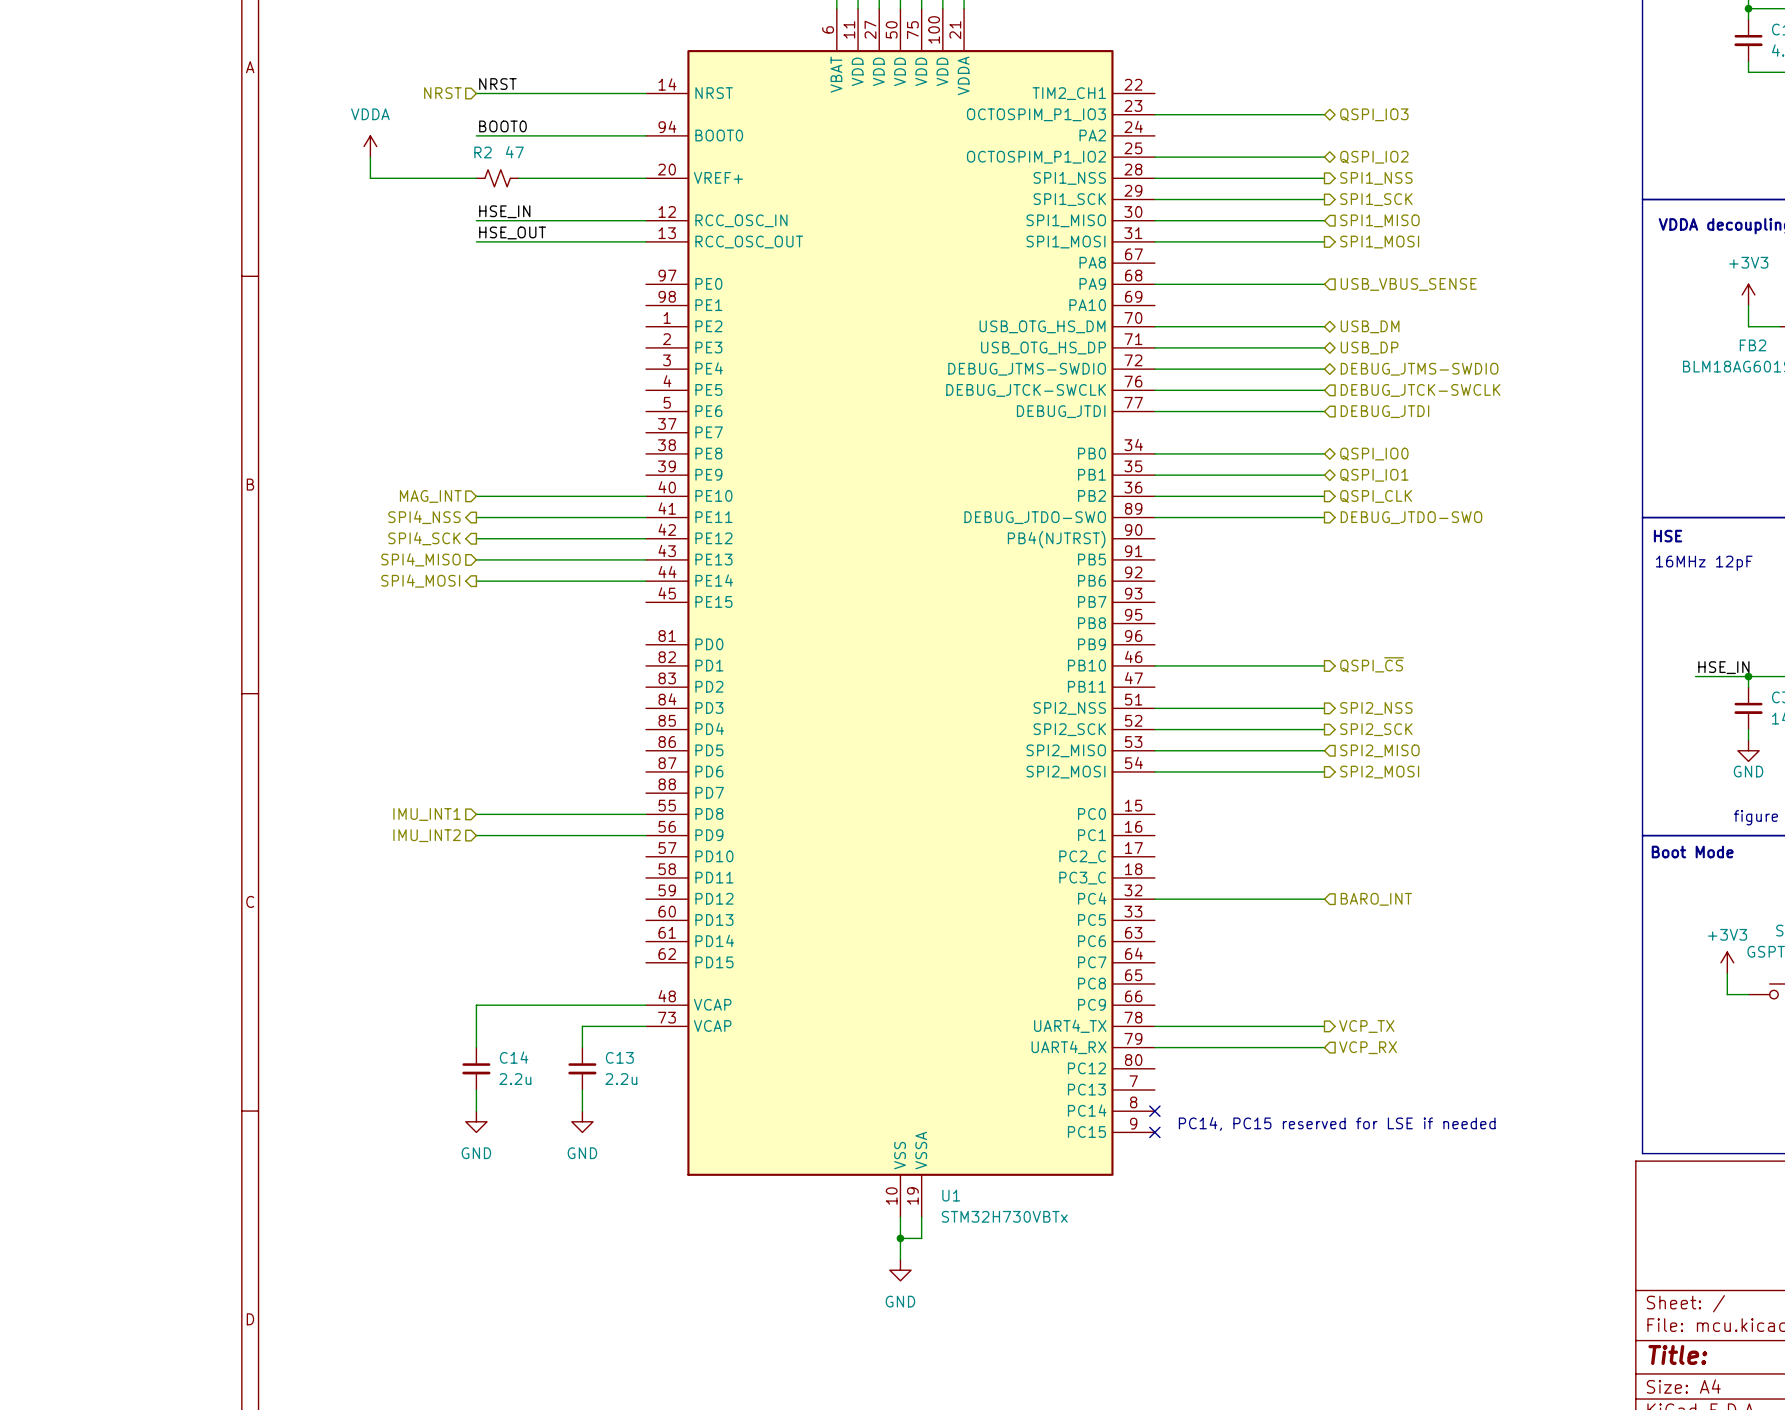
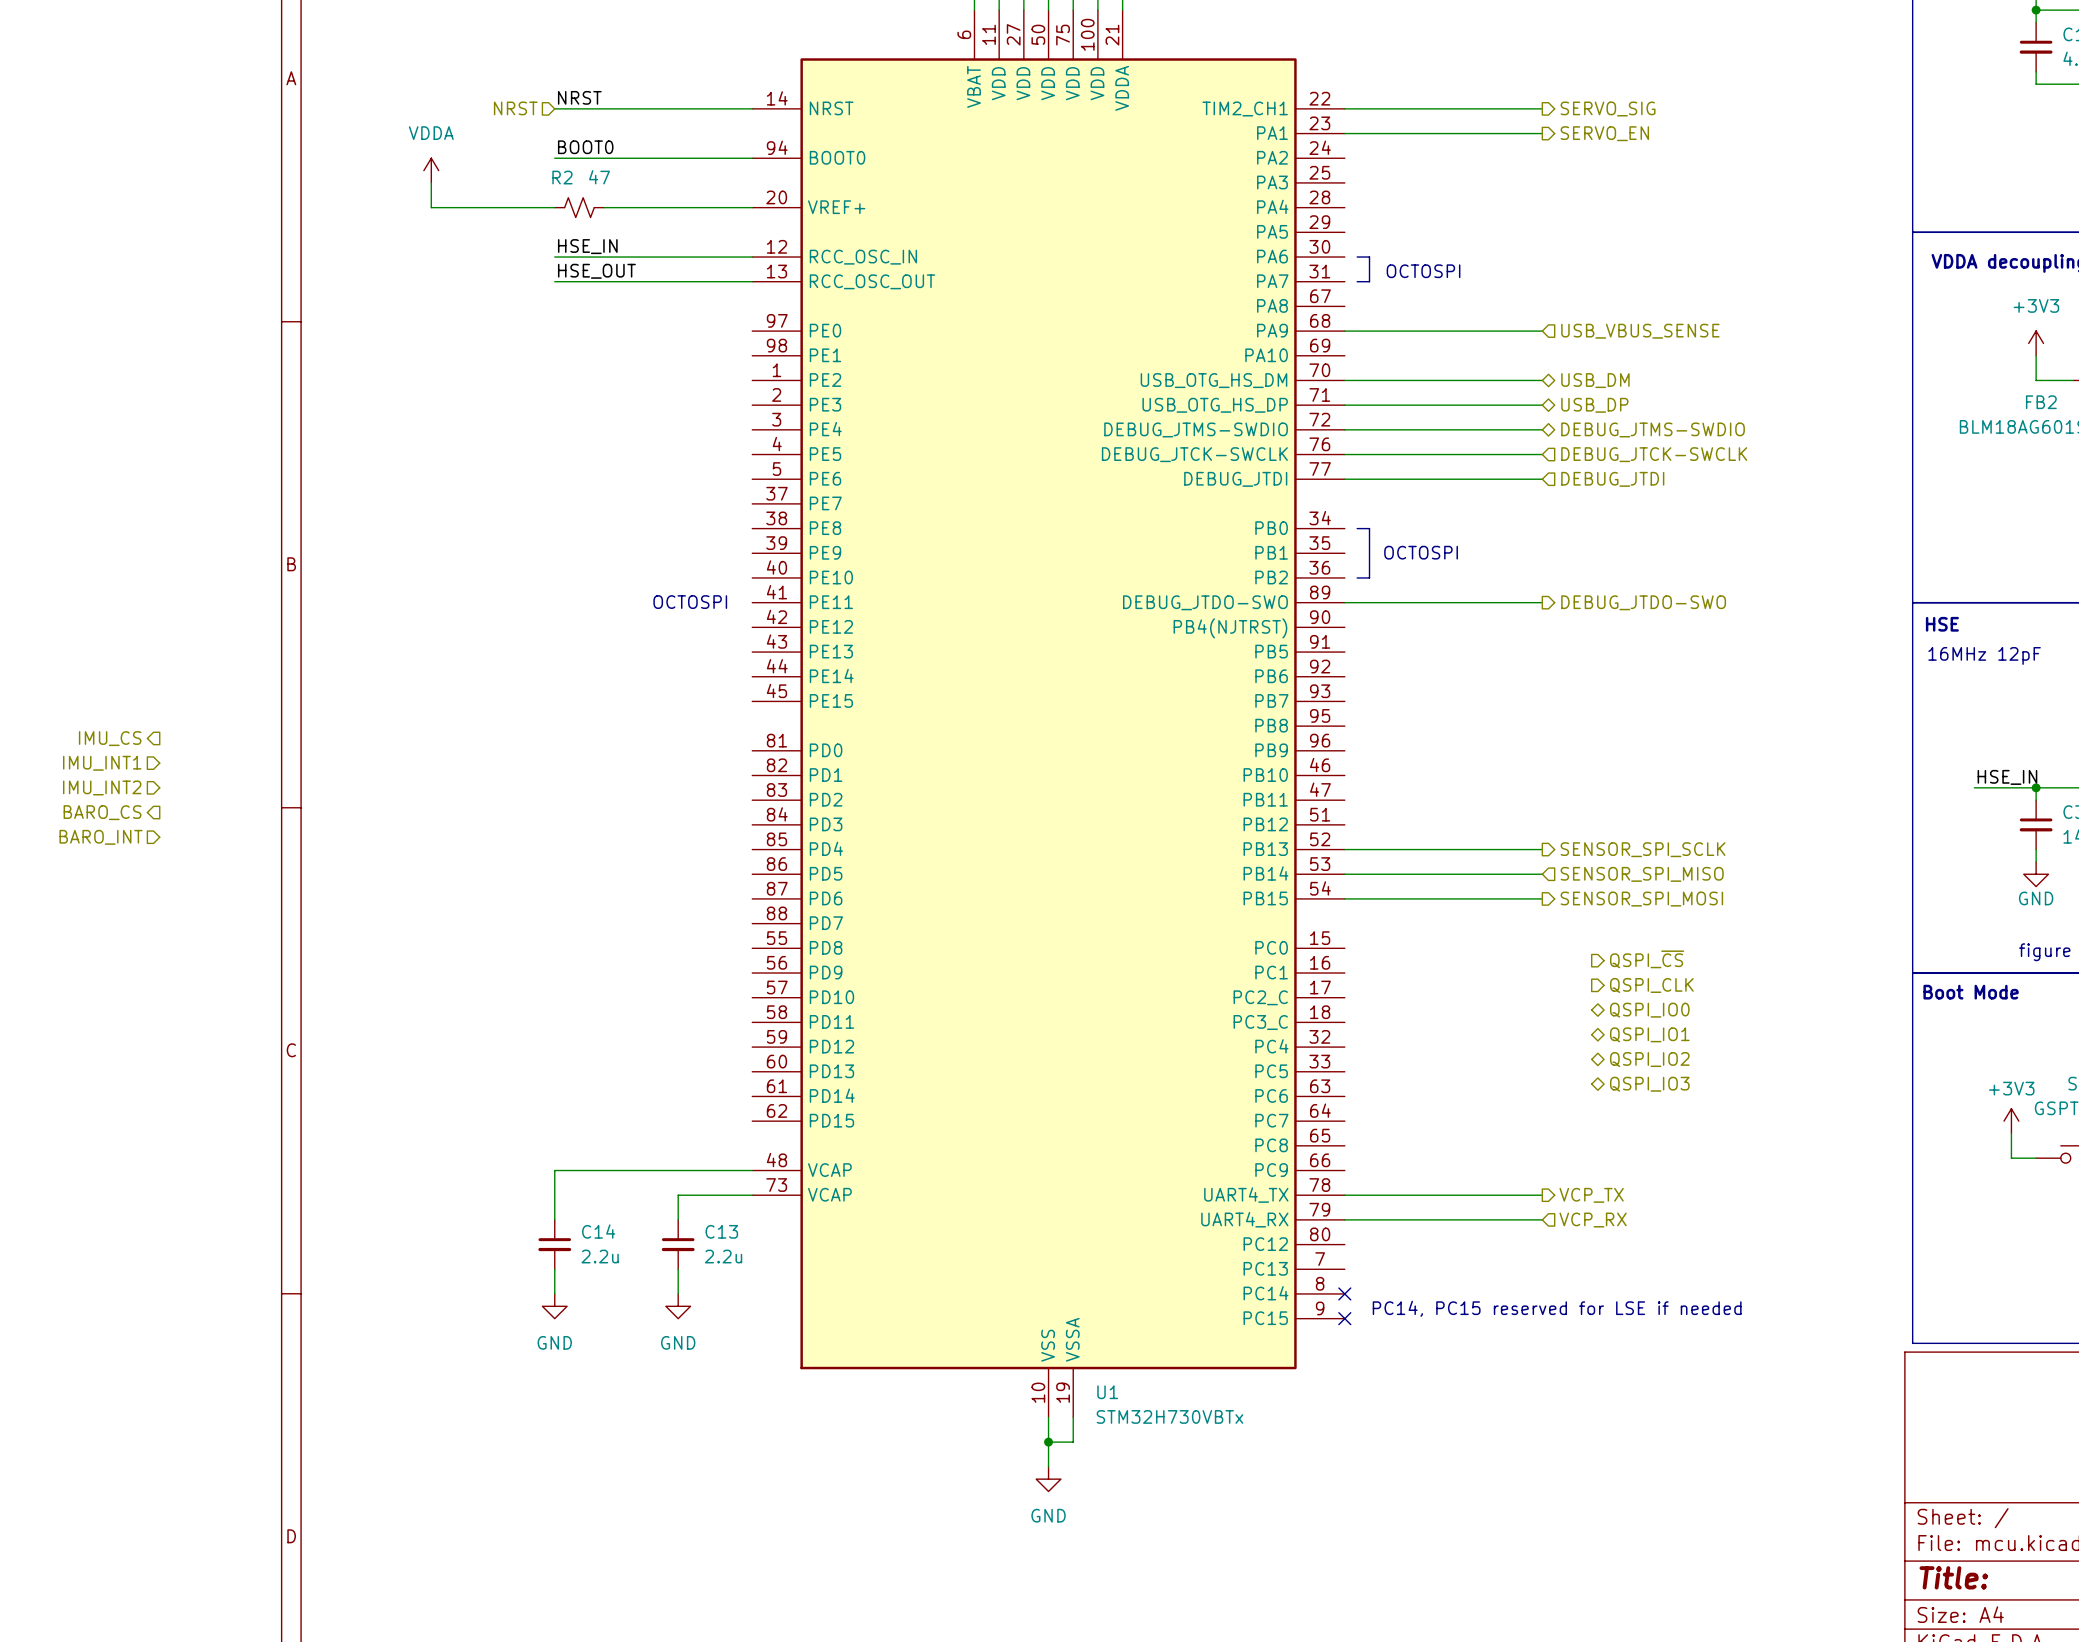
U1 symbol: [646, 8, 1155, 1218] -> [752, 10, 1345, 1418]
hierarchical label: none -> SERVO_SIG (1608, 109)
hierarchical label shape: bidirectional (1374, 114) -> output (1604, 133)
hierarchical label: QSPI_IO3 (1374, 114) -> SERVO_EN (1604, 133)
wire: (1154, 157) (1324, 157) -> (1344, 108) (1542, 108)
hierarchical label: QSPI_IO2 (1374, 157) -> none
wire: (1154, 178) (1324, 178) -> none
hierarchical label: SPI1_NSS (1376, 178) -> none
wire: (1154, 199) (1324, 199) -> none
hierarchical label: SPI1_SCK (1376, 199) -> none
wire: (1154, 220) (1324, 220) -> none
line: none -> (1357, 257) (1369, 257) (1369, 281) (1357, 281)
hierarchical label: SPI1_MISO (1379, 220) -> none
text: none -> OCTOSPI (1423, 271)
wire: (1154, 241) (1324, 241) -> none
hierarchical label: SPI1_MOSI (1379, 242) -> none
wire: (1154, 453) (1324, 453) -> none
line: none -> (1357, 528) (1369, 528) (1369, 577) (1357, 577)
hierarchical label: QSPI_IO0 (1374, 454) -> none
text: none -> OCTOSPI (1421, 552)
wire: (1154, 475) (1324, 475) -> none
hierarchical label: QSPI_IO1 (1374, 475) -> none
hierarchical label: MAG_INT (430, 496) -> none
wire: (476, 496) (646, 496) -> none
wire: (1154, 496) (1324, 496) -> none
hierarchical label: QSPI_CLK (1376, 496) -> none
hierarchical label: SPI4_NSS (424, 517) -> none
wire: (476, 517) (646, 517) -> none
text: none -> OCTOSPI (690, 602)
hierarchical label: SPI4_SCK (424, 538) -> none
wire: (476, 538) (646, 538) -> none
hierarchical label: SPI4_MISO (420, 559) -> none
wire: (476, 559) (646, 559) -> none
hierarchical label: SPI4_MOSI (420, 581) -> none
wire: (476, 581) (646, 581) -> none
hierarchical label: none -> IMU_CS (110, 738)
hierarchical label: none -> IMU_INT1 (102, 763)
hierarchical label position: QSPI_~{CS} (1372, 664) -> QSPI_~{CS} (1647, 959)
wire: (1154, 665) (1324, 665) -> none
hierarchical label: none -> IMU_INT2 (102, 787)
hierarchical label: none -> BARO_CS (102, 812)
wire: (1154, 708) (1324, 708) -> none
hierarchical label: SPI2_NSS (1376, 708) -> none
hierarchical label: none -> BARO_INT (101, 837)
hierarchical label: SPI2_SCK (1376, 729) -> SENSOR_SPI_SCLK (1643, 849)
hierarchical label: SPI2_MISO (1379, 750) -> SENSOR_SPI_MISO (1642, 874)
hierarchical label: SPI2_MOSI (1379, 772) -> SENSOR_SPI_MOSI (1641, 899)
hierarchical label: IMU_INT1 (427, 814) -> none
wire: (476, 814) (646, 814) -> none
hierarchical label: IMU_INT2 (427, 835) -> none
wire: (476, 835) (646, 835) -> none
hierarchical label: none -> QSPI_CLK (1651, 985)
hierarchical label: none -> QSPI_IO0 (1649, 1010)
hierarchical label: none -> QSPI_IO1 (1649, 1034)
wire: (1154, 899) (1324, 899) -> none
hierarchical label: BARO_INT (1376, 899) -> none
hierarchical label: none -> QSPI_IO2 (1649, 1059)
hierarchical label: none -> QSPI_IO3 (1649, 1084)

